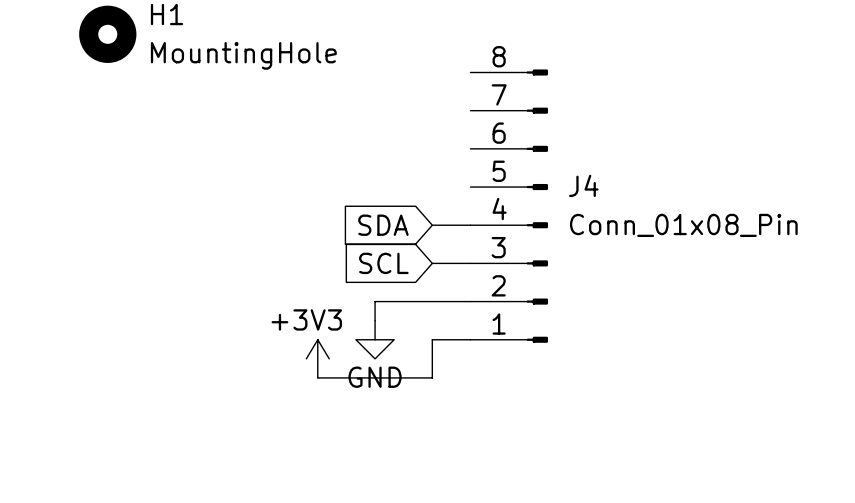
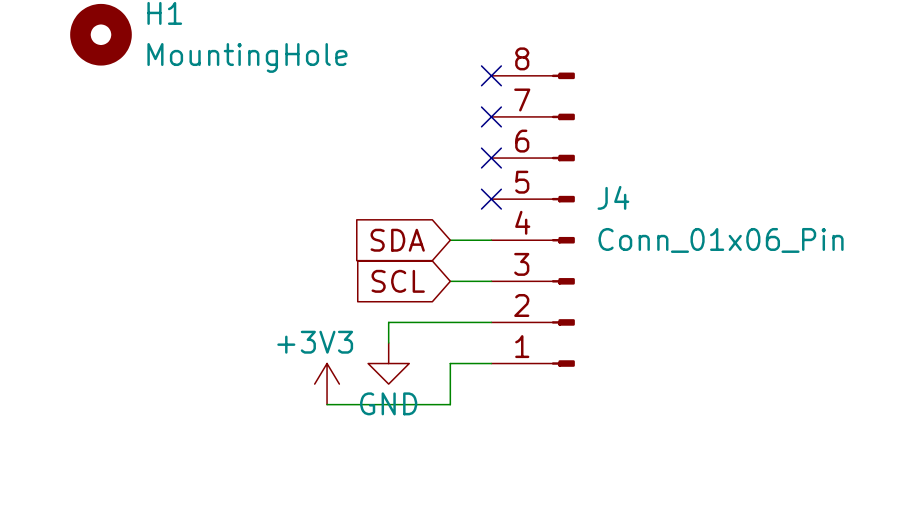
no-connect mark: none -> (491, 75)
no-connect mark: none -> (491, 116)
no-connect mark: none -> (491, 158)
no-connect mark: none -> (491, 199)
J4 value: Conn_01x08_Pin (683, 225) -> Conn_01x06_Pin (721, 240)

